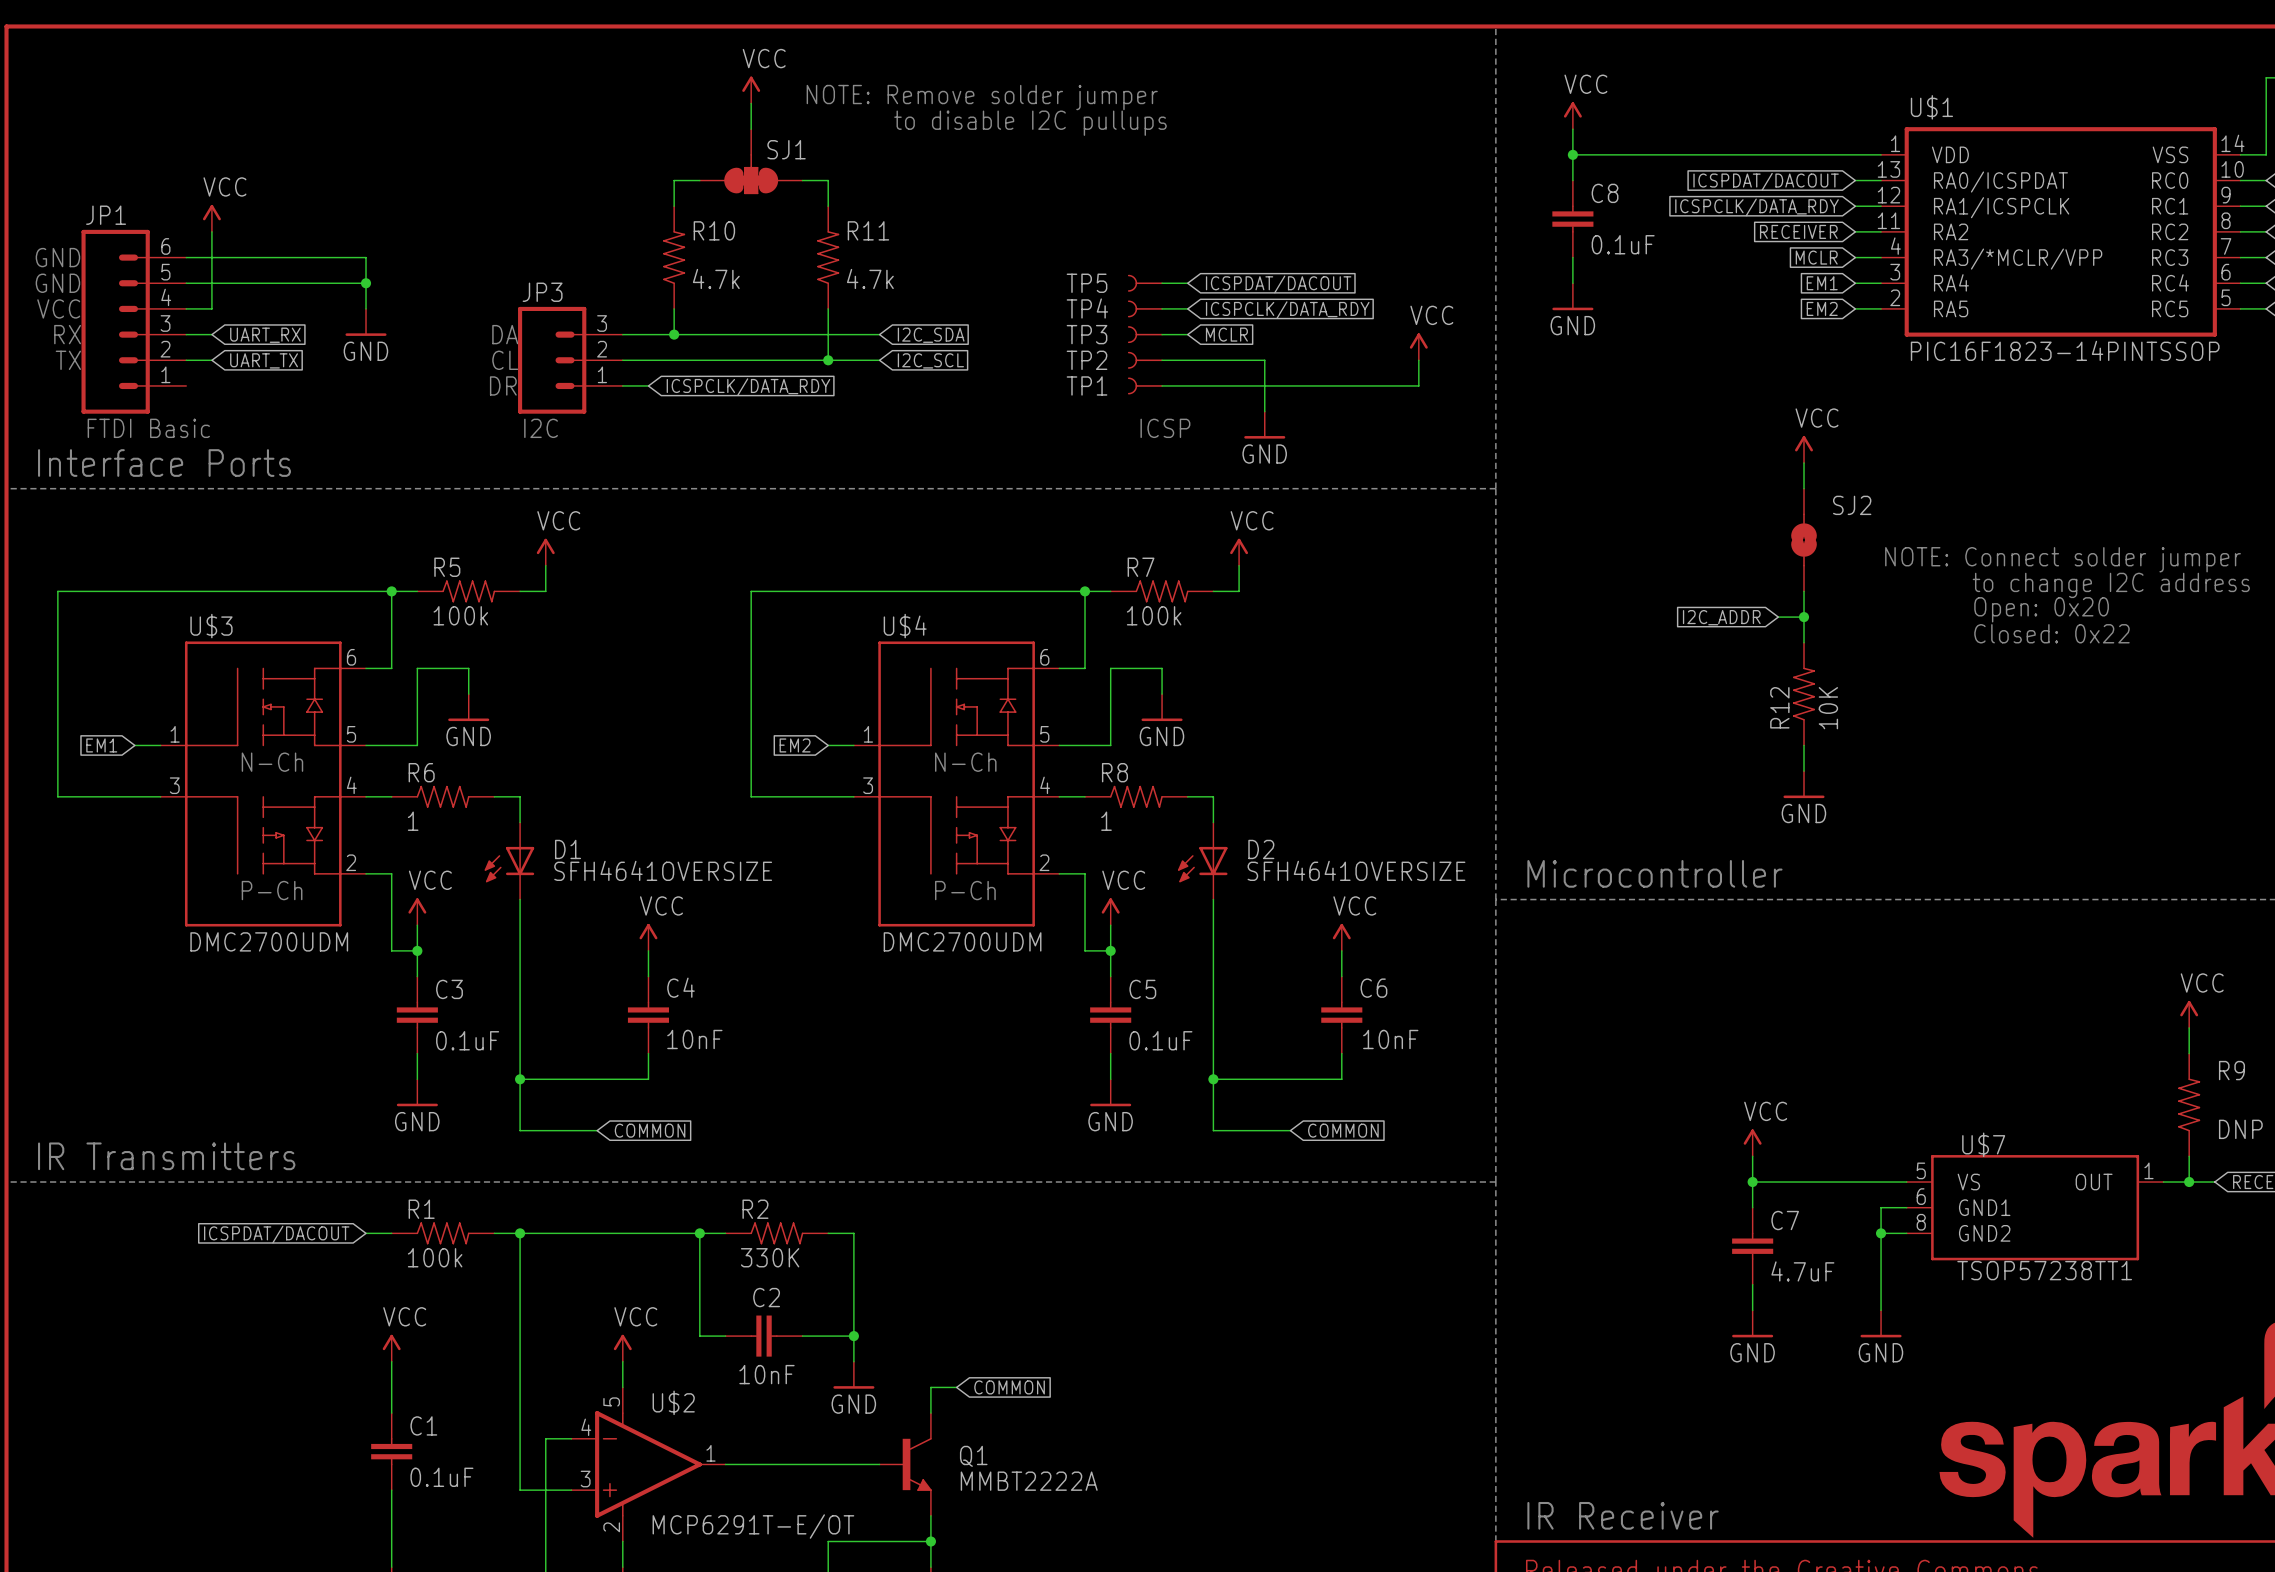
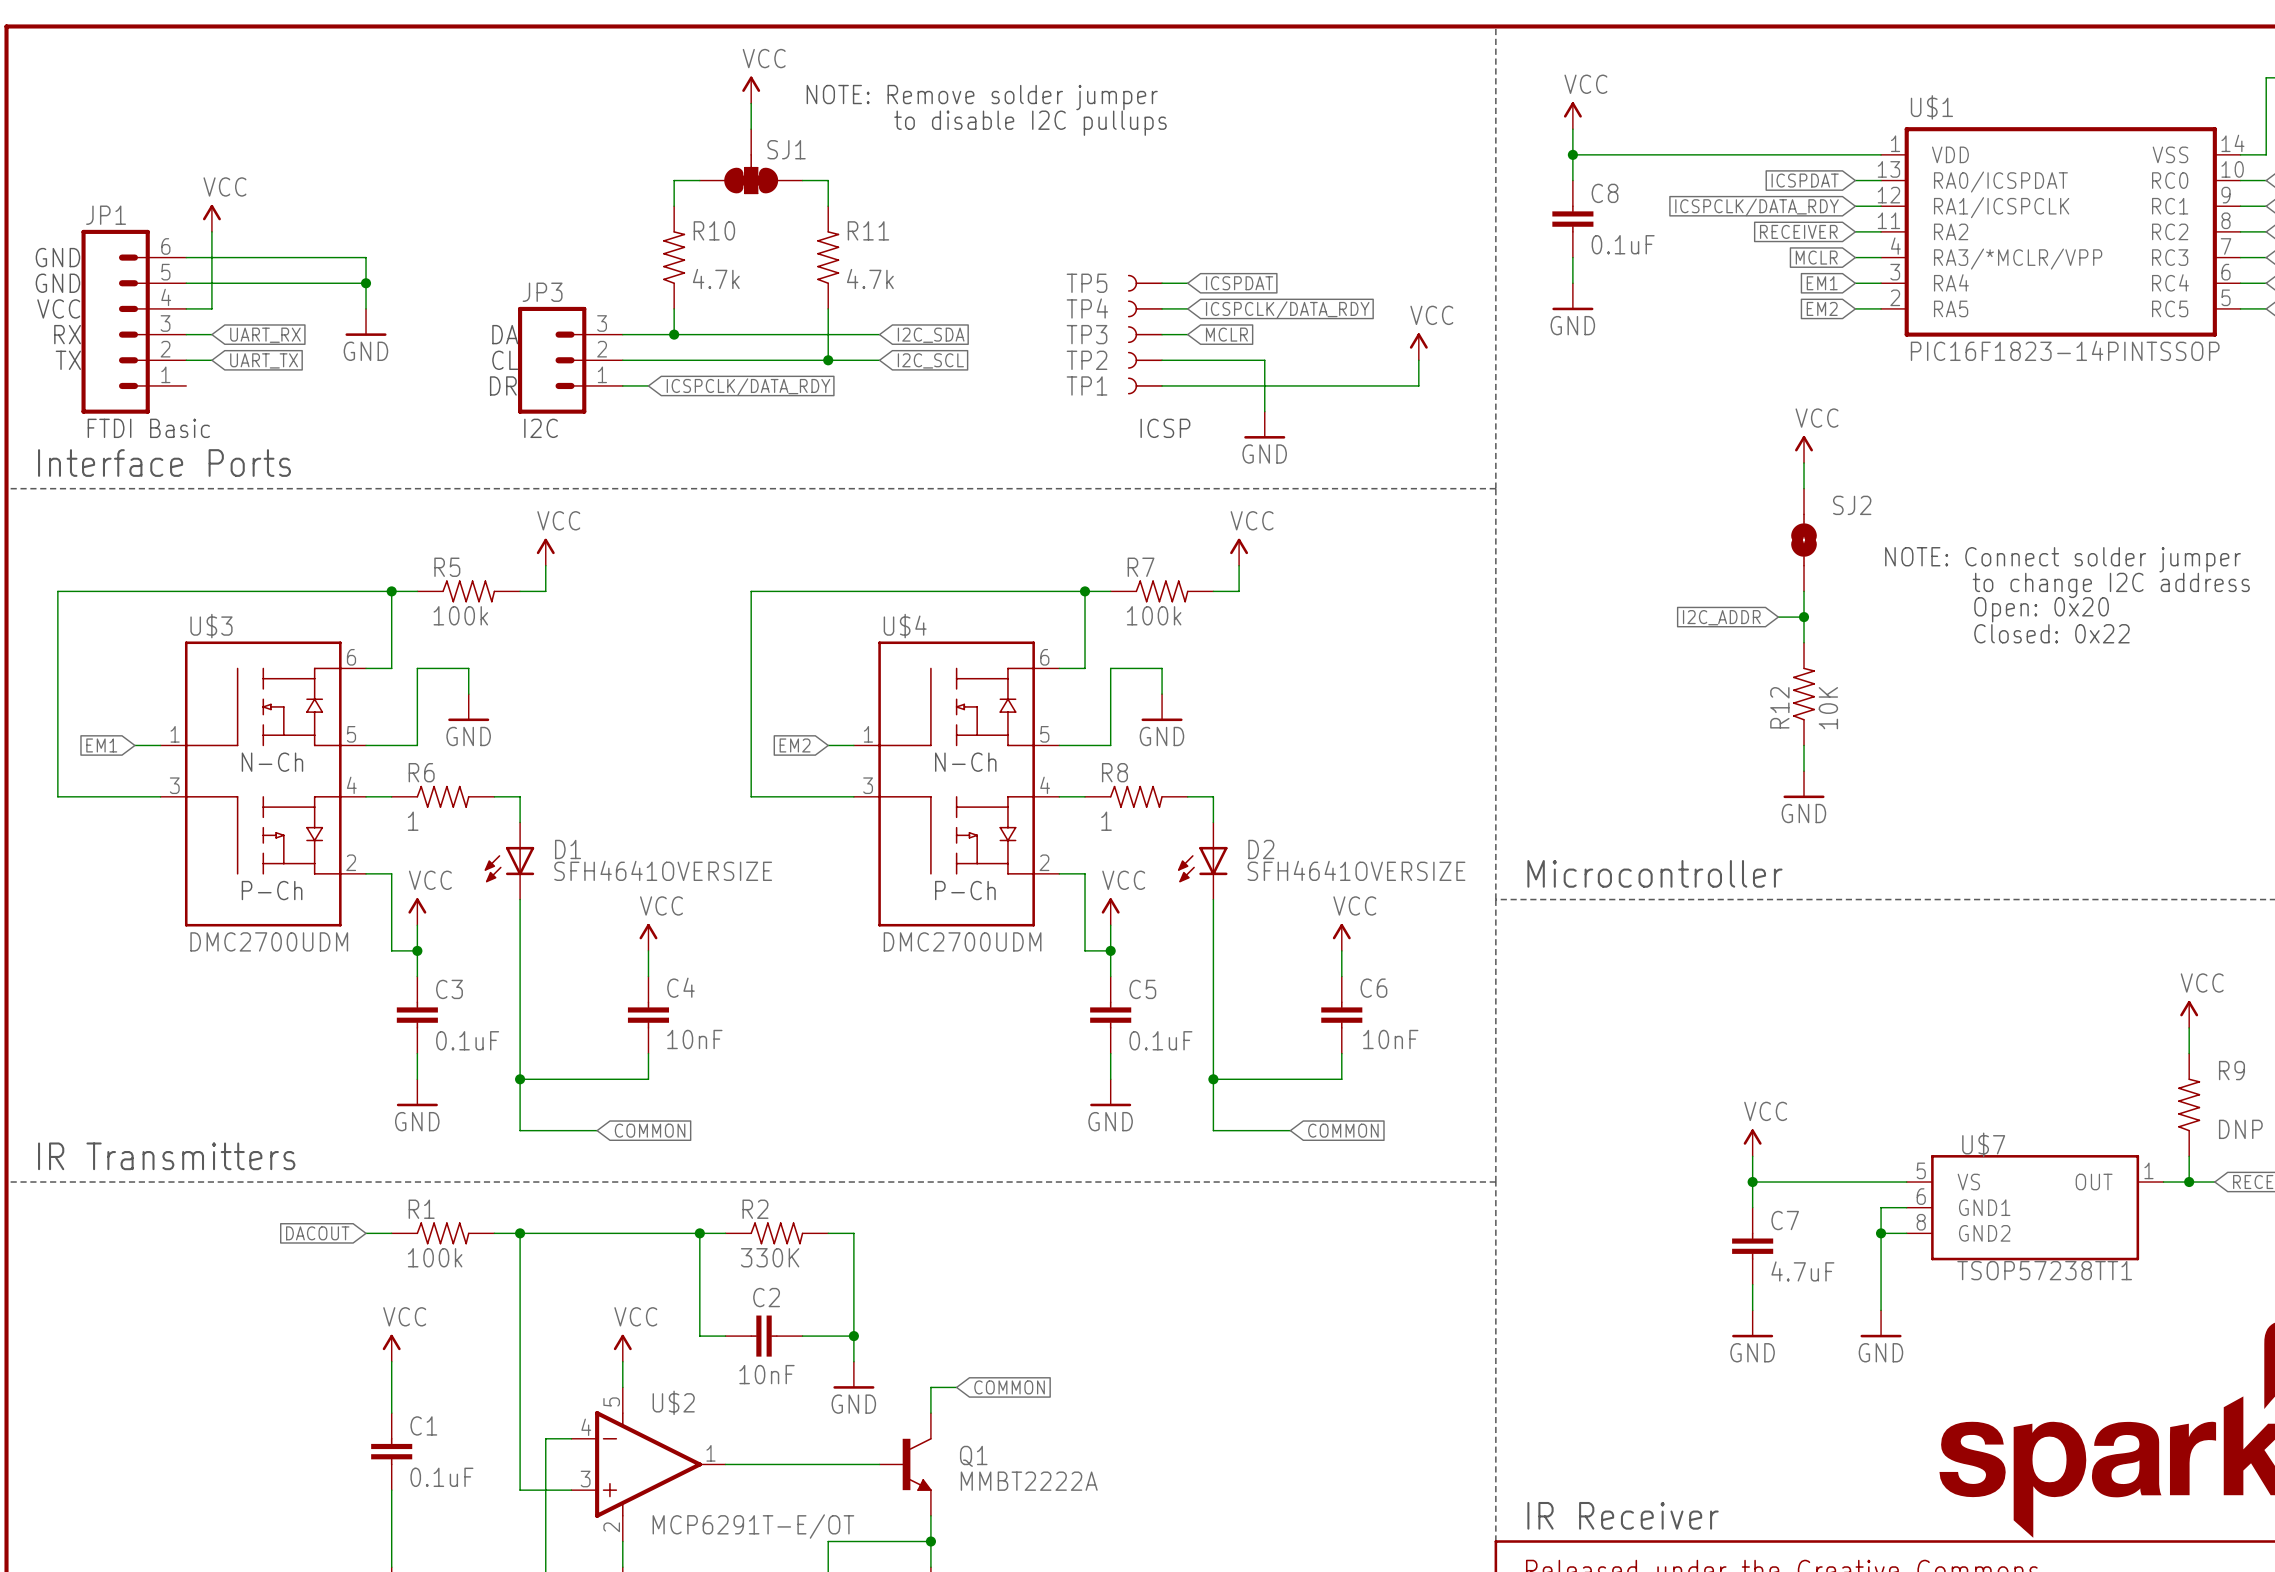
global label: ICSPDAT/DACOUT (1766, 181) -> ICSPDAT (1805, 180)
global label: ICSPDAT/DACOUT (1278, 284) -> ICSPDAT (1239, 283)
global label: ICSPDAT/DACOUT (276, 1234) -> DACOUT (317, 1233)

